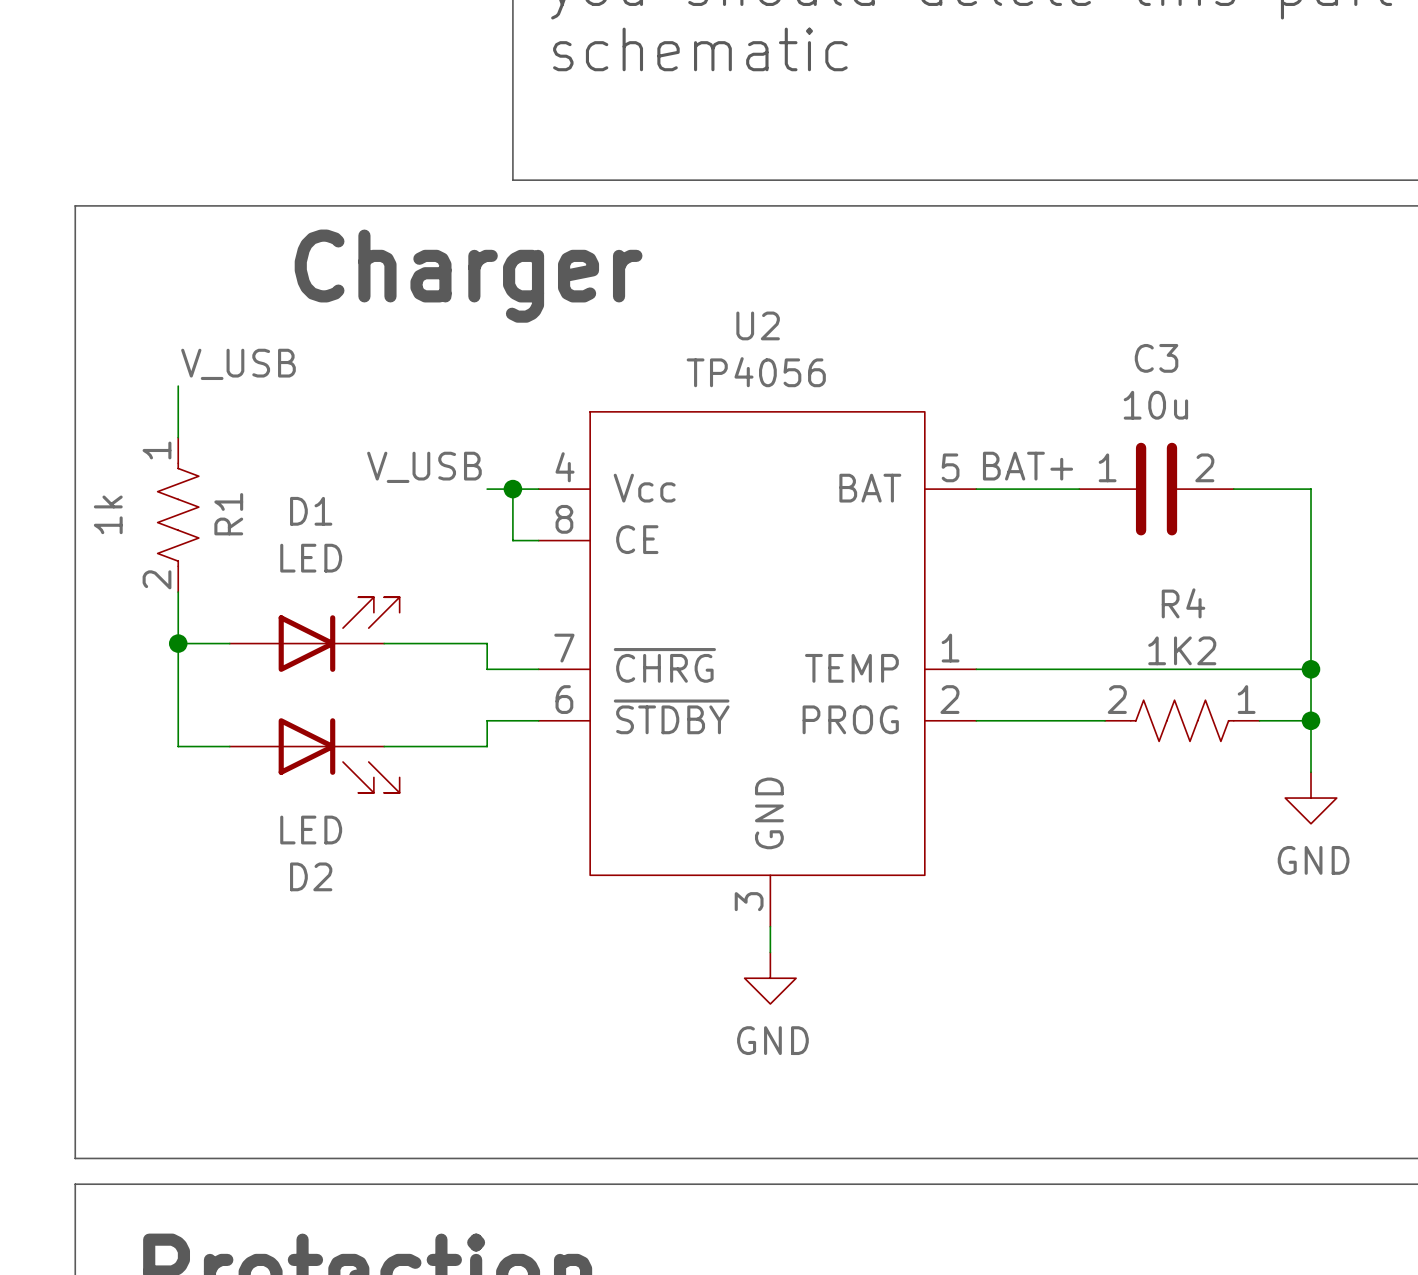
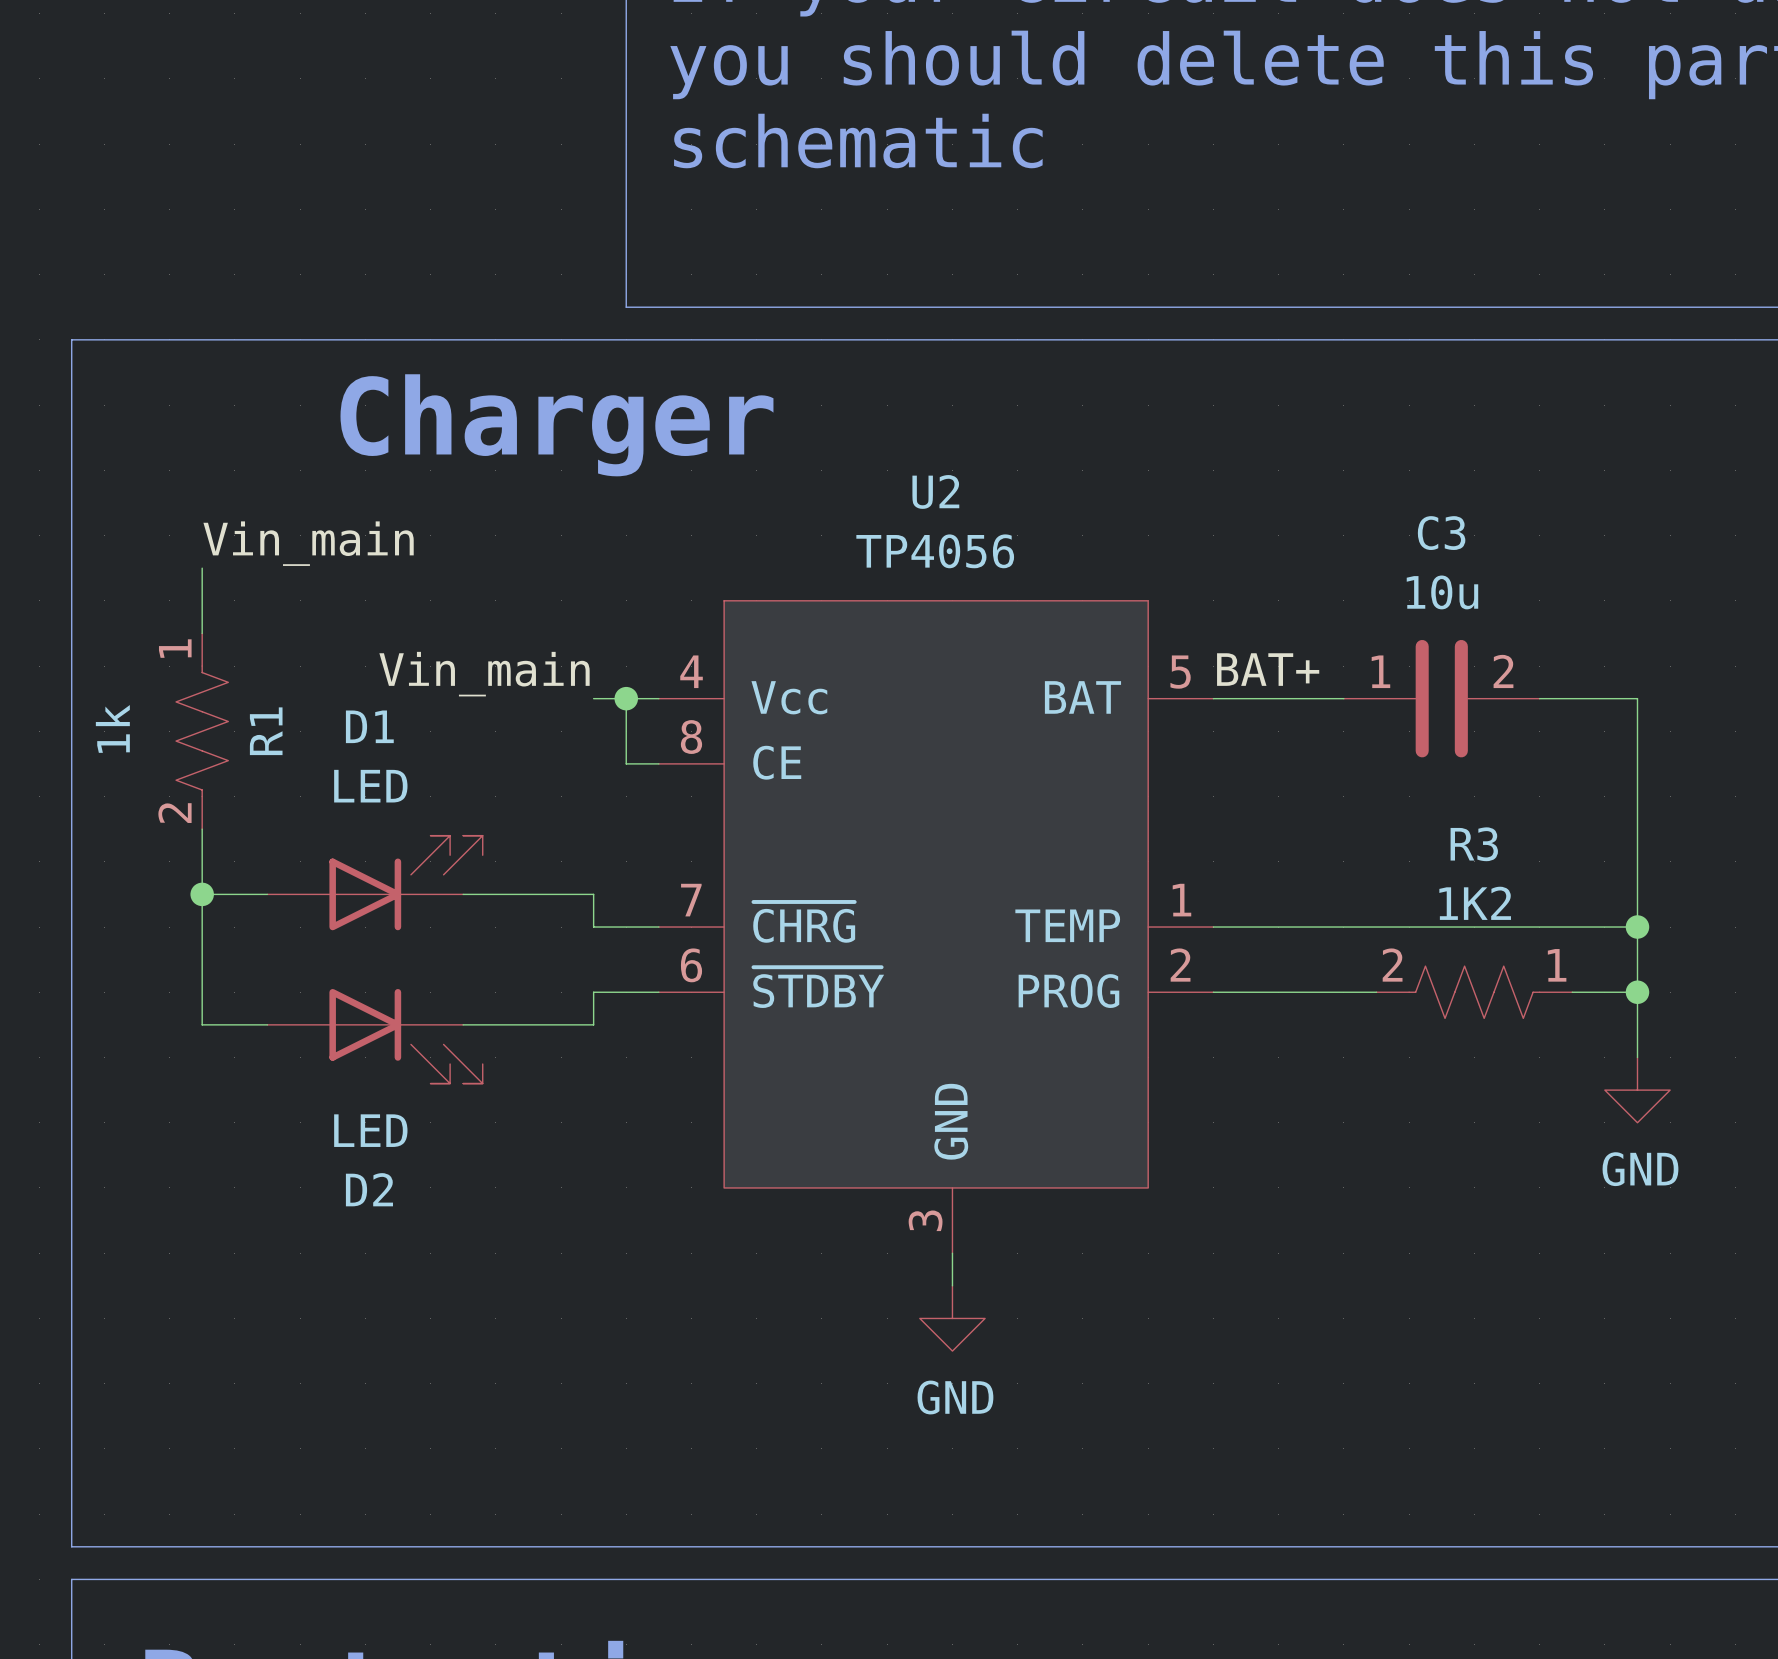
label: V_USB (238, 364) -> Vin_main (308, 543)
label: V_USB (424, 467) -> Vin_main (484, 674)
R4 name: R4 (1183, 603) -> R3 (1474, 844)

